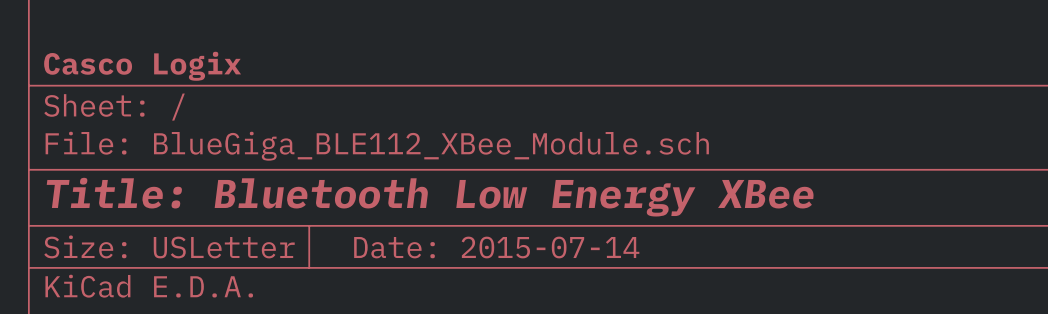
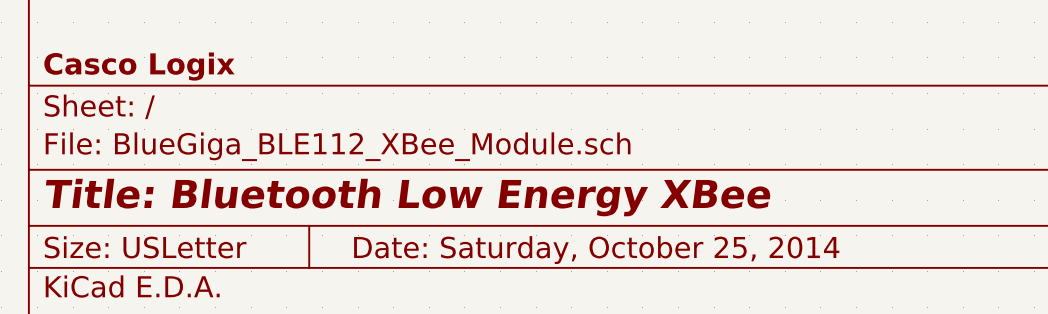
title block: Date: 2015-07-14 (496, 247) -> Date: Saturday, October 25, 2014 (596, 250)

